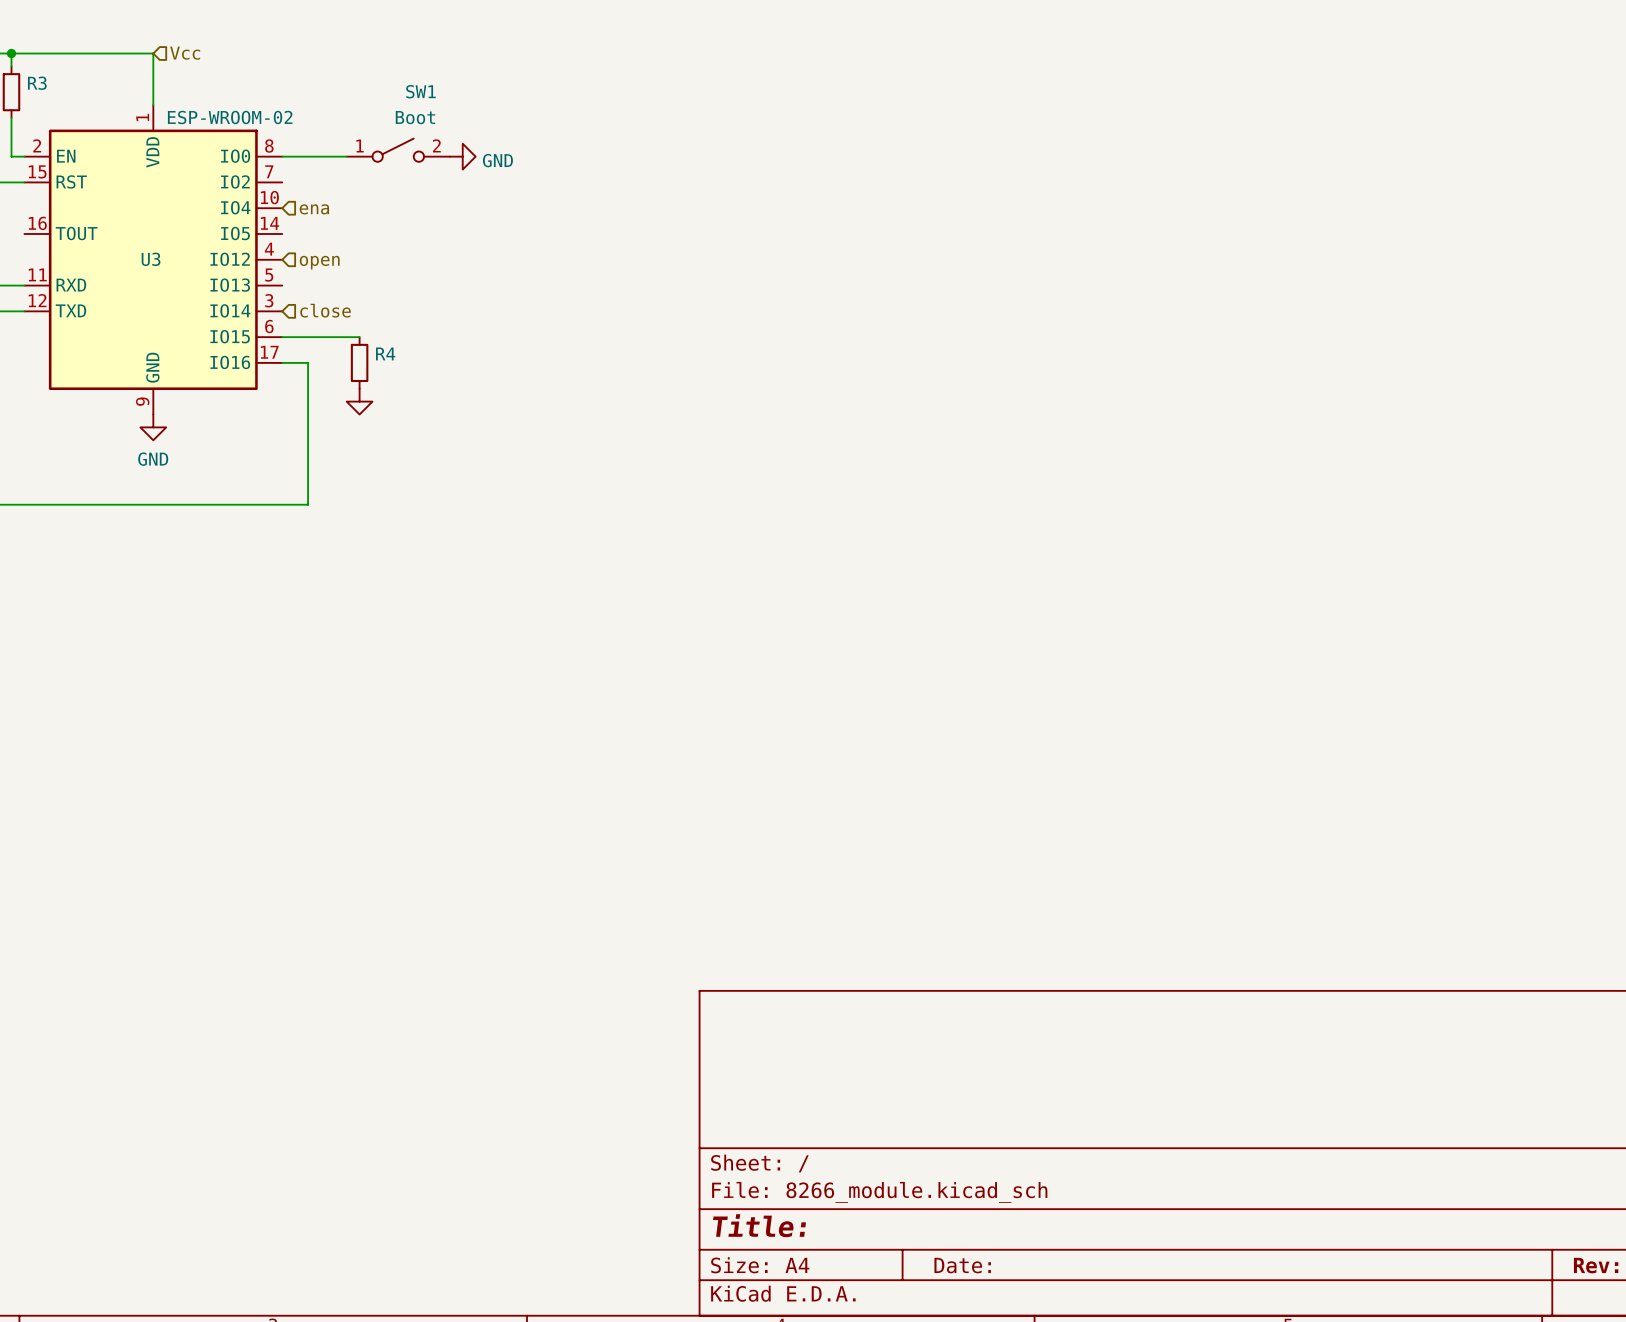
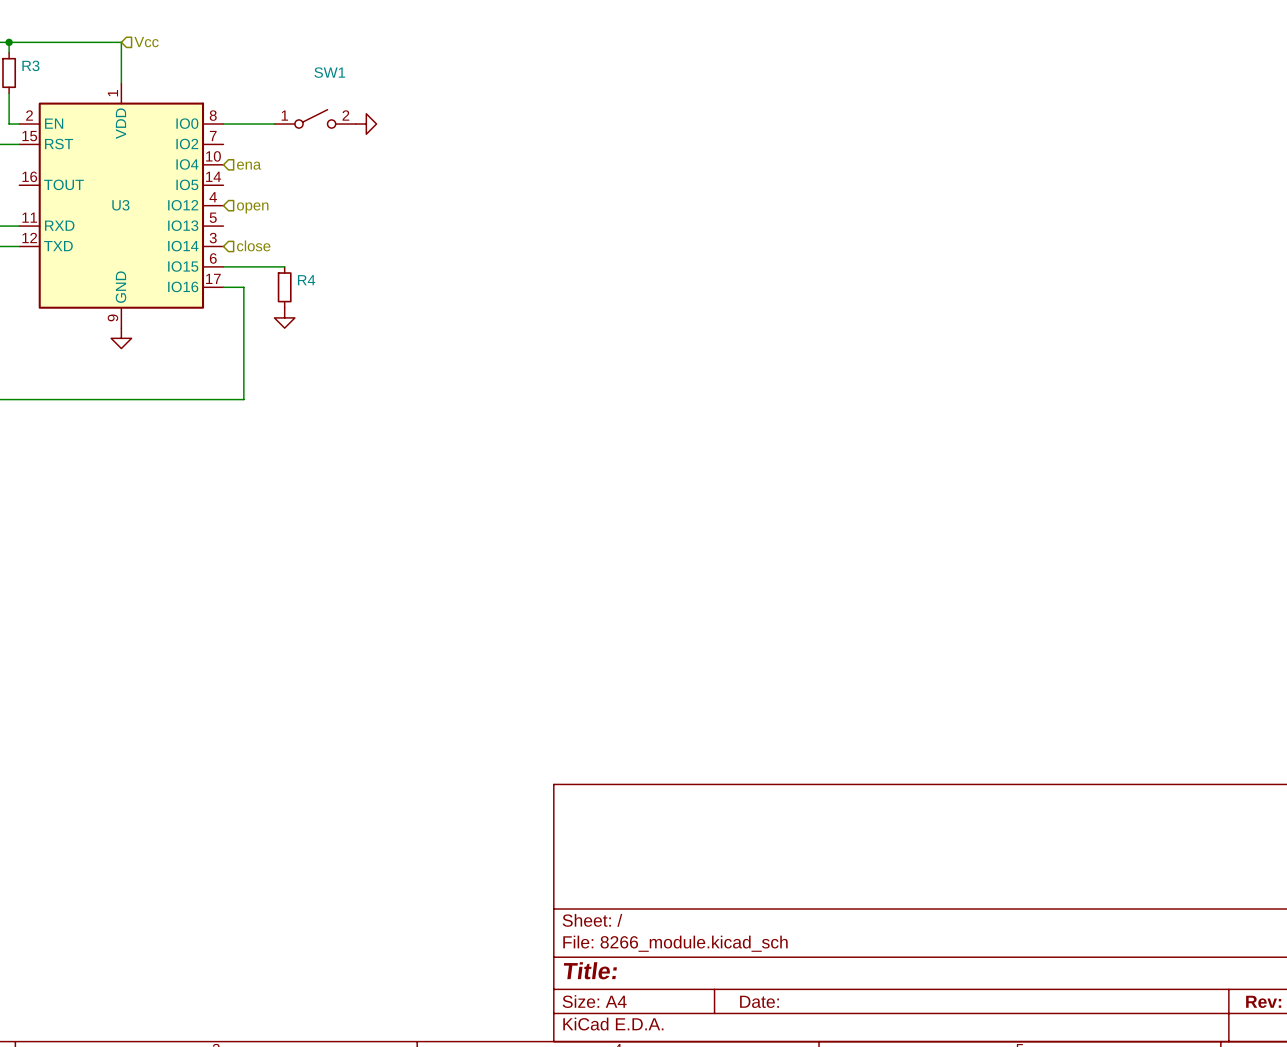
U3 value: ESP-WROOM-02 (230, 117) -> none
SW1 value: Boot (415, 117) -> none
power symbol text: GND (497, 160) -> none
power symbol text: GND (153, 459) -> none

